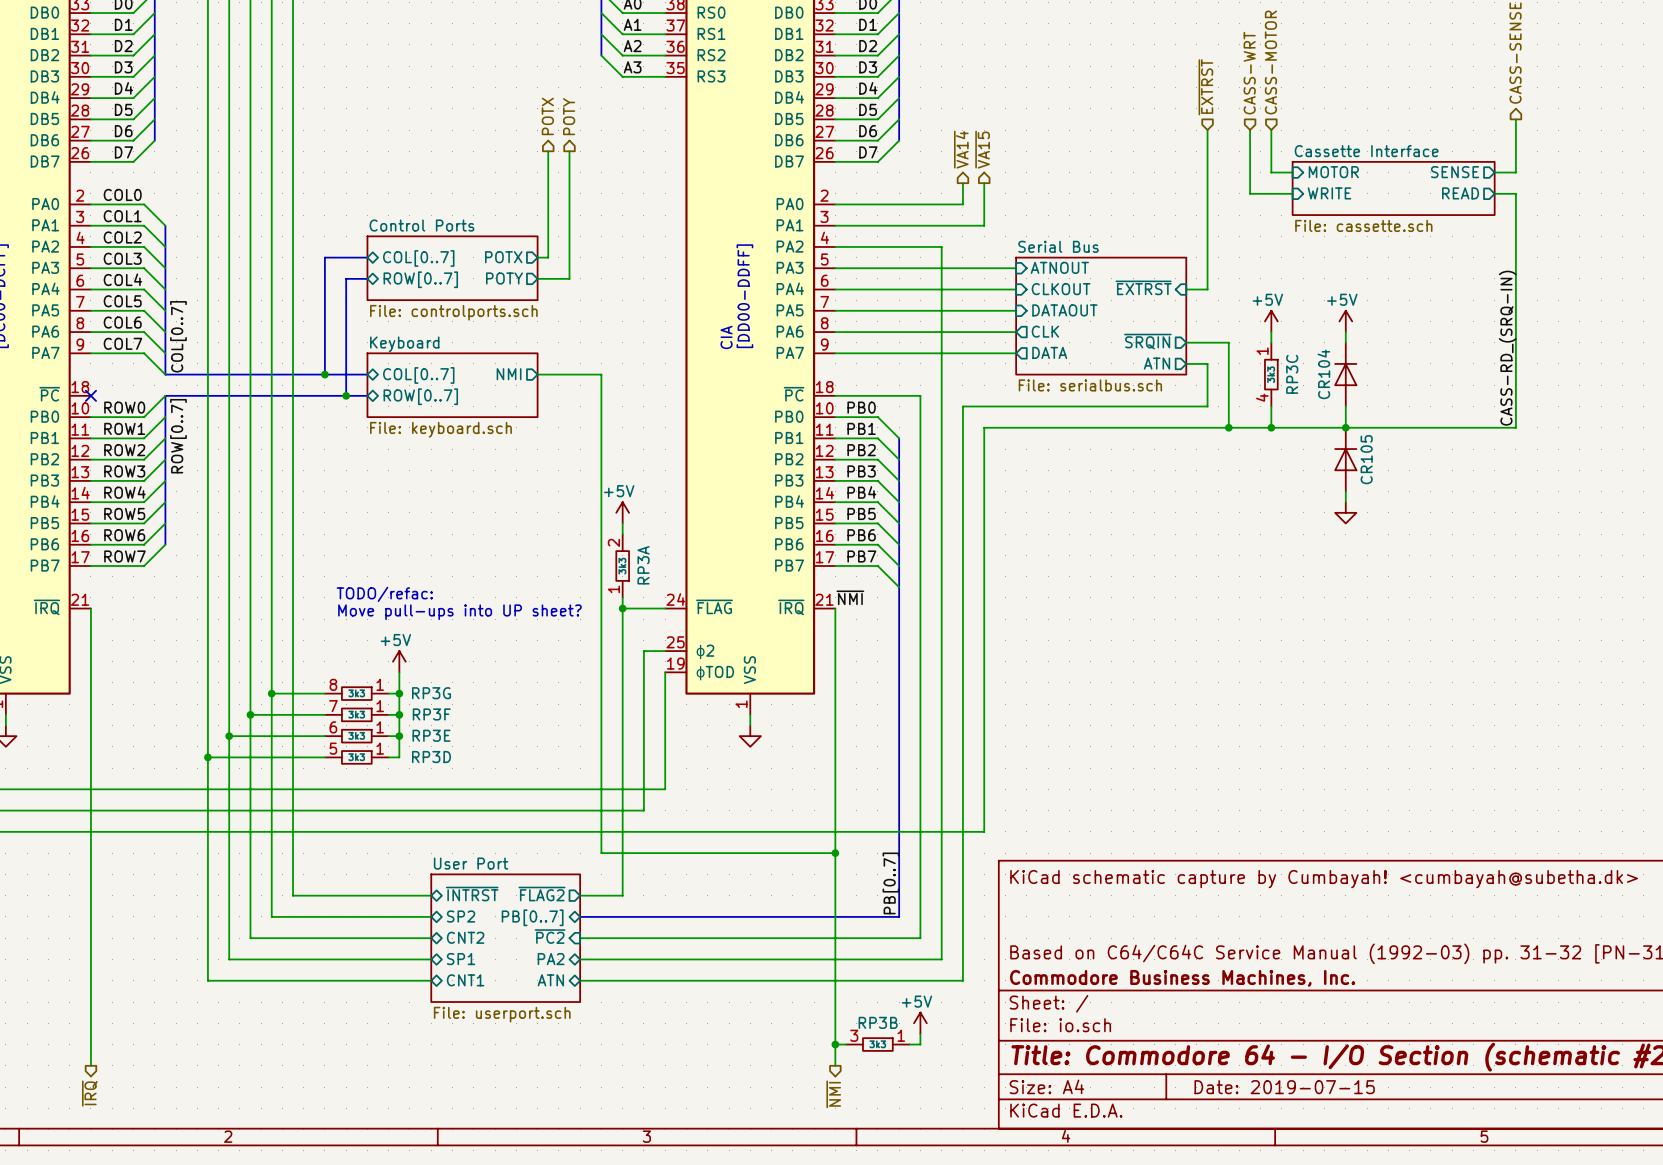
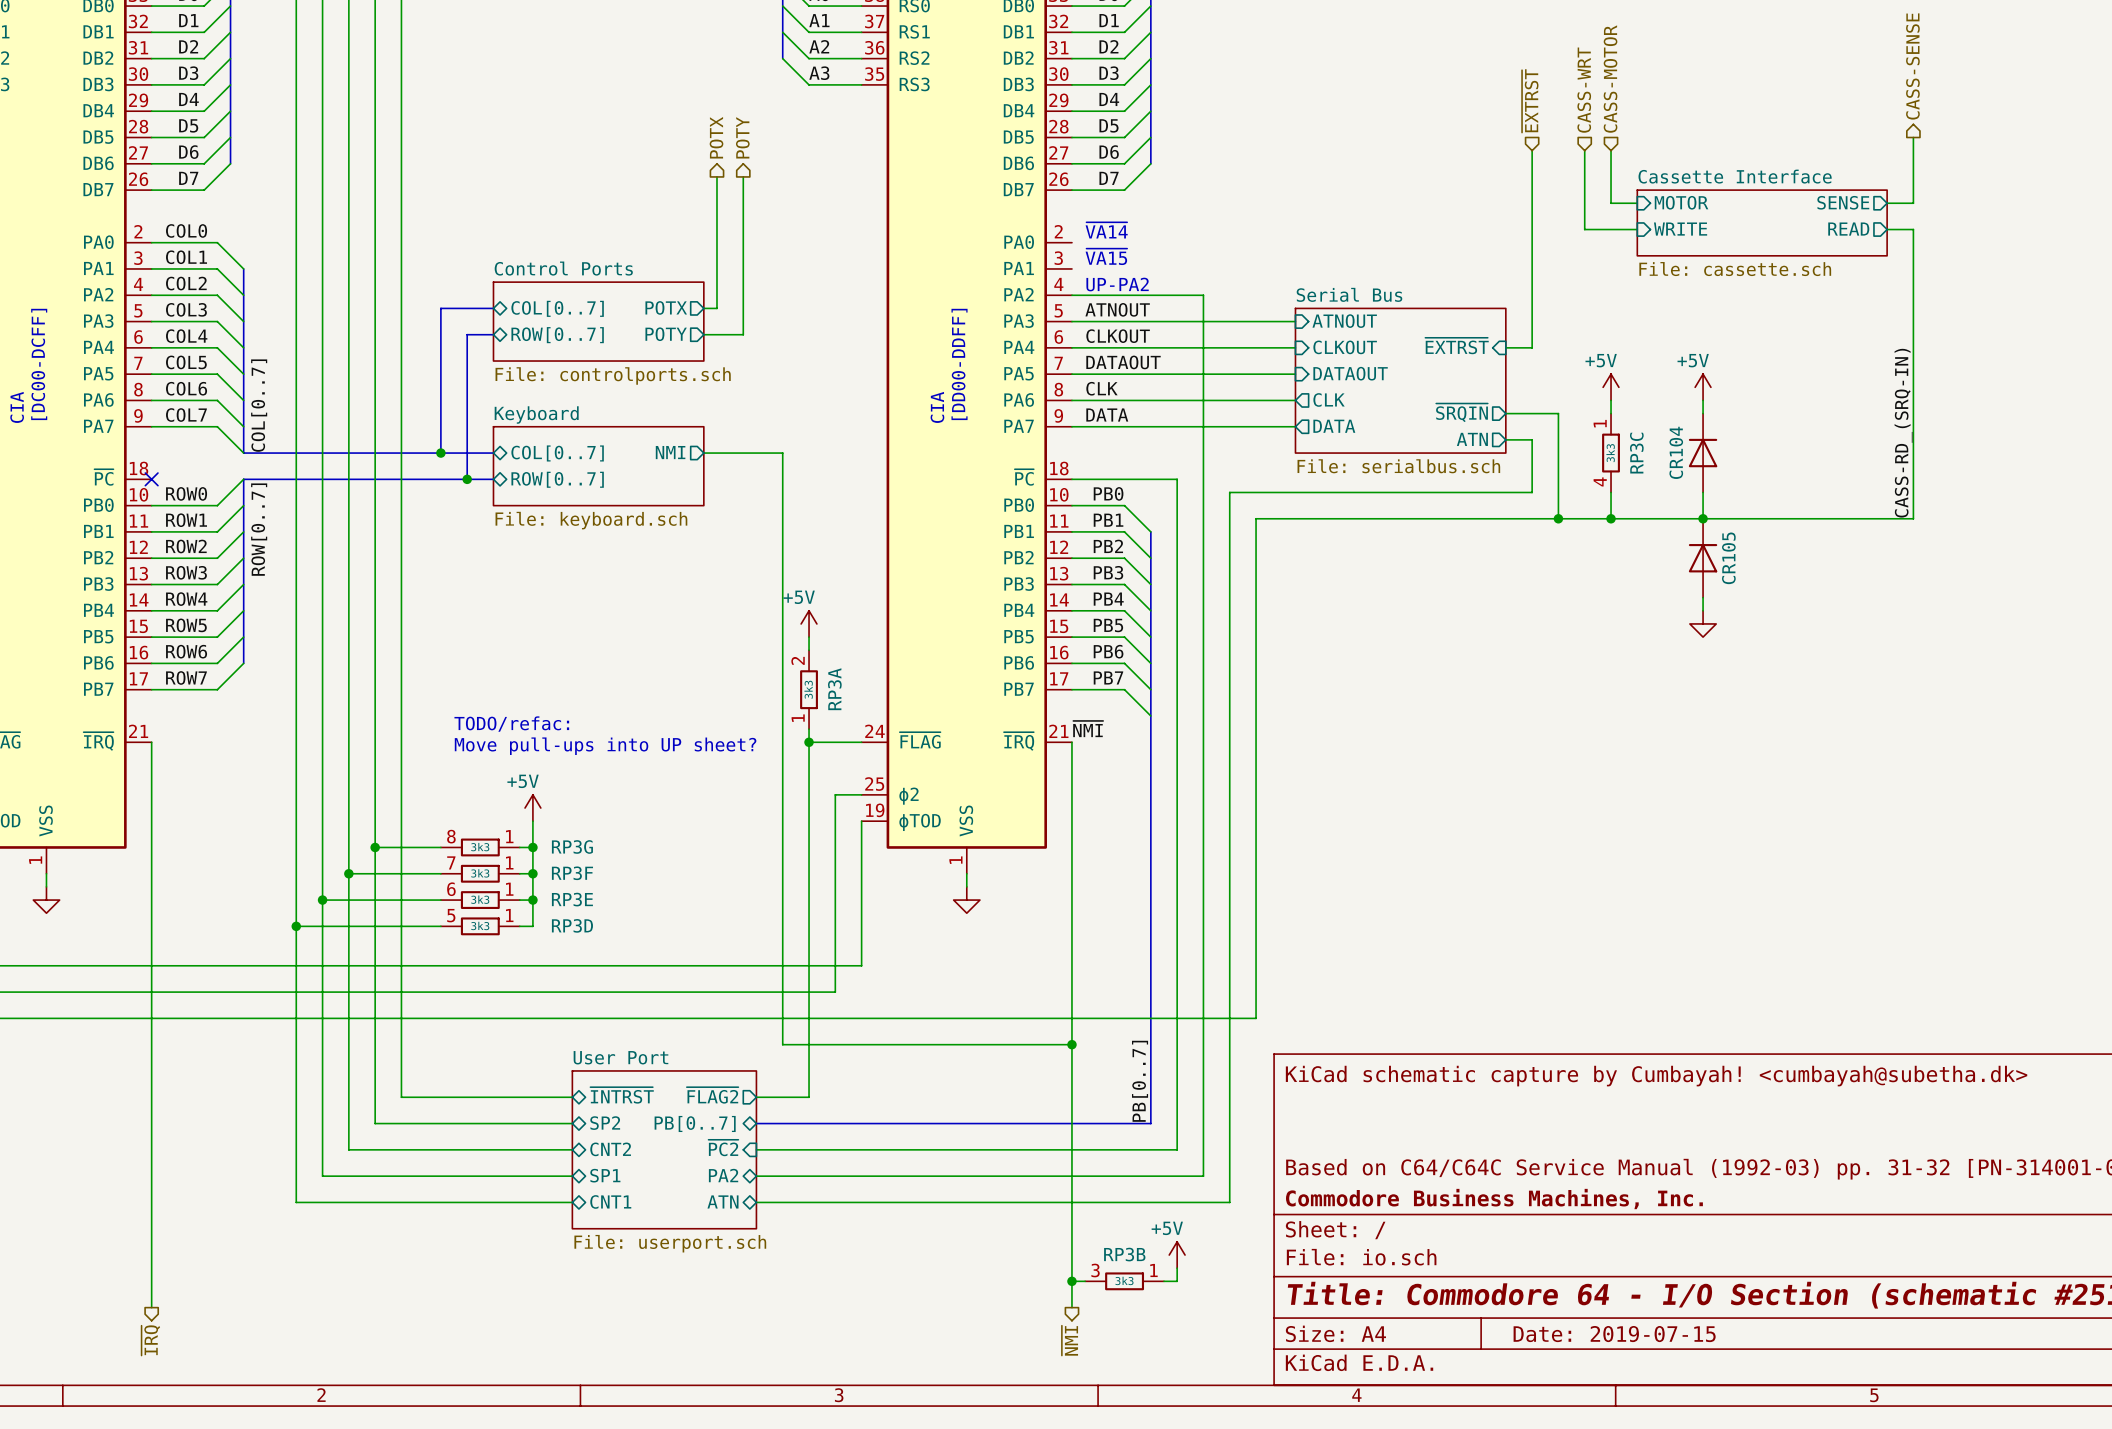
hierarchical label: ~{VA14} (961, 149) -> none
hierarchical label: ~{VA15} (982, 149) -> none
wire: (962, 183) (962, 204) (835, 204) -> none
wire: (984, 183) (984, 225) (835, 225) -> none
text: none -> ~{VA14} (1106, 230)
text: none -> ~{VA15} (1106, 256)
text: none -> UP-PA2 (1117, 284)
label: none -> ATNOUT (1117, 309)
label: none -> CLKOUT (1118, 336)
label: none -> DATAOUT (1123, 362)
label: none -> CLK (1101, 388)
label: none -> DATA (1107, 415)

